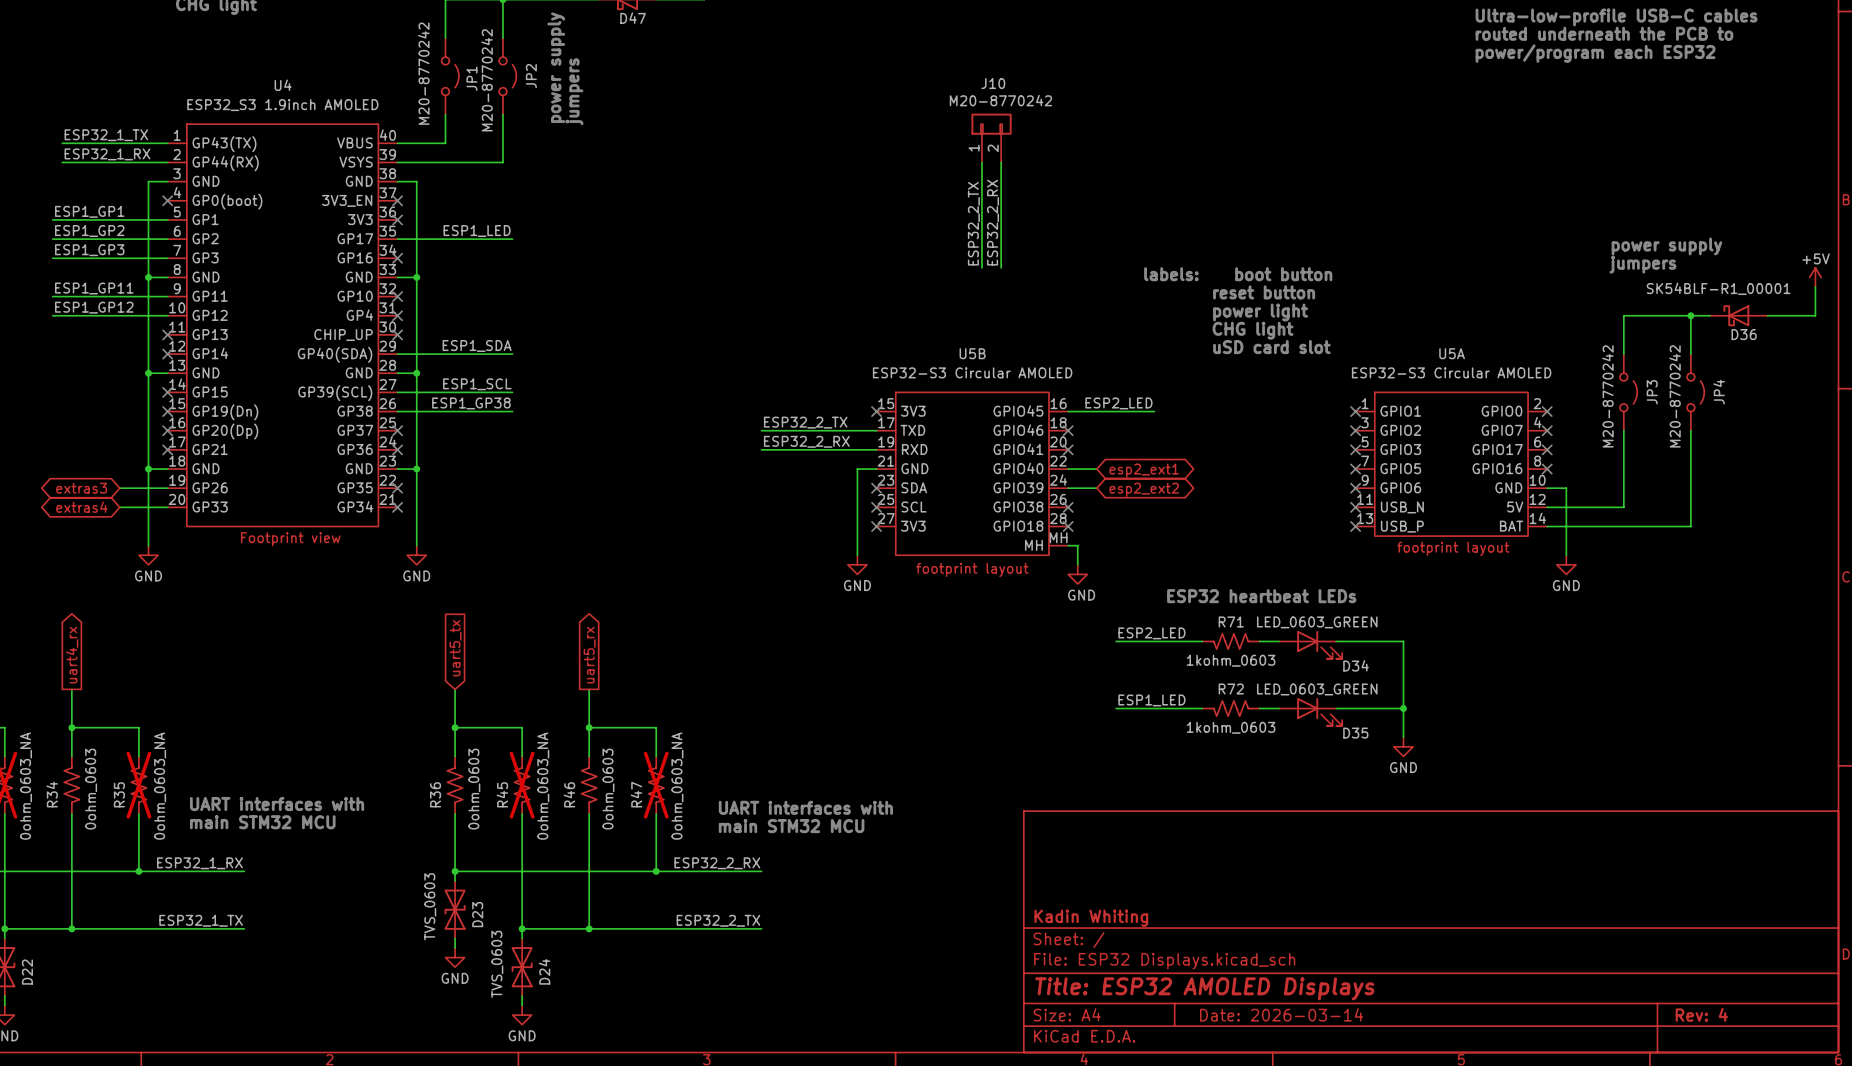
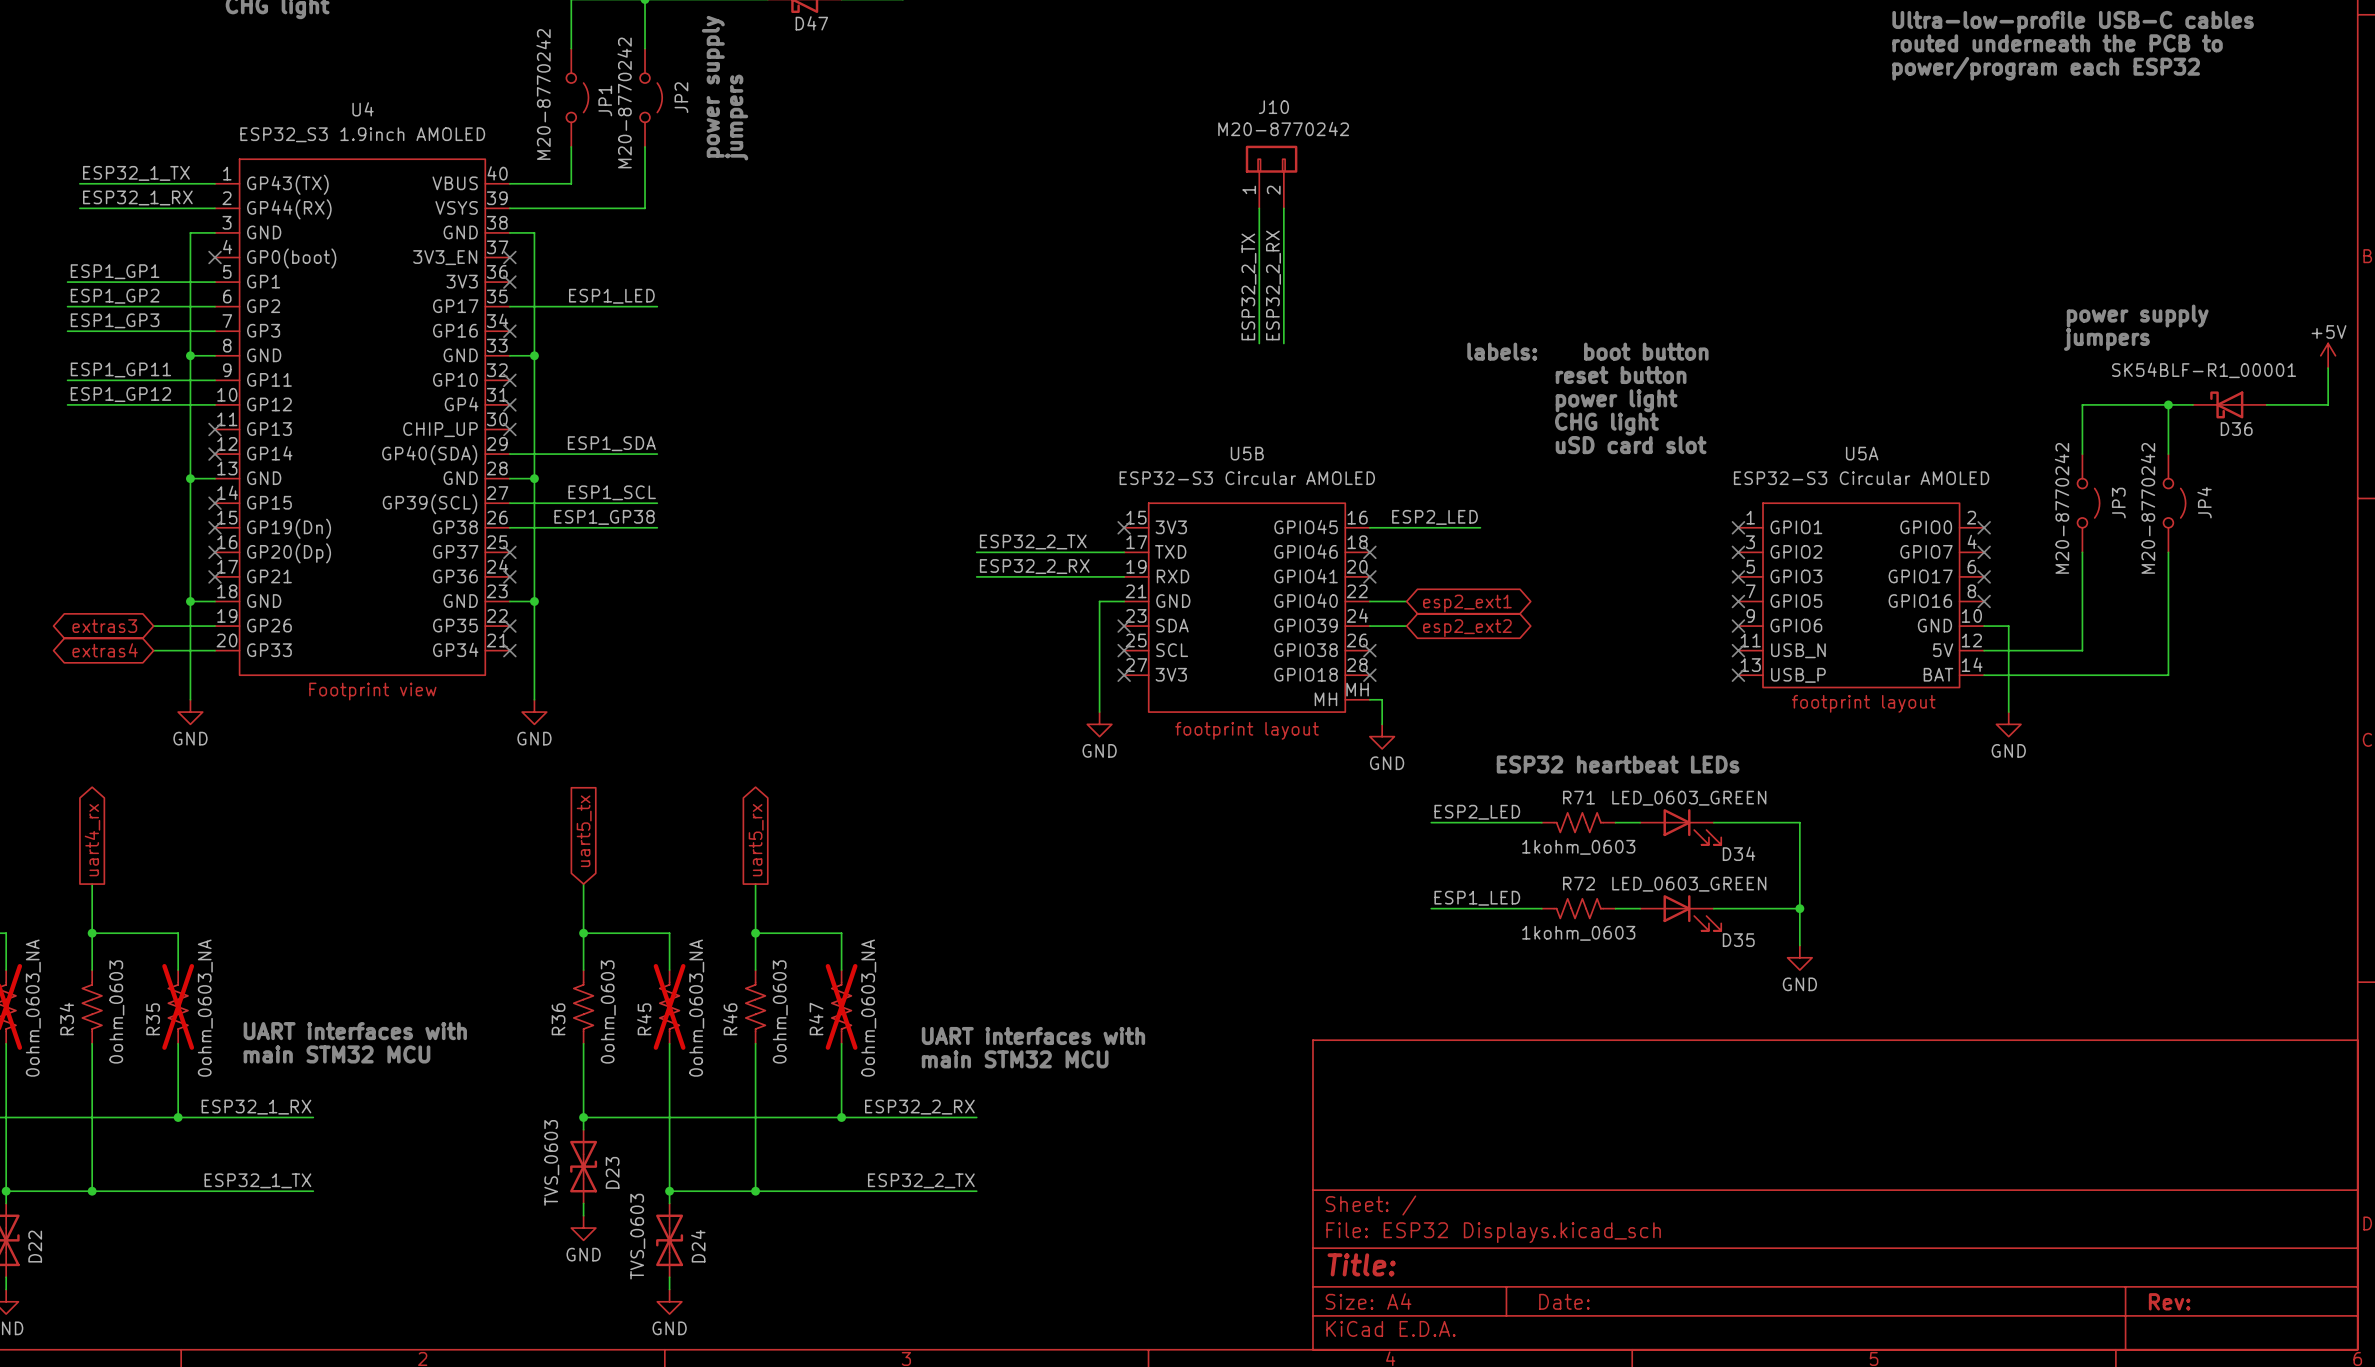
title block: Kadin Whiting (1091, 918) -> none
title block: Title: ESP32 AMOLED Displays (1204, 988) -> Title: (1361, 1264)
title block: Date: 2026-03-14 (1281, 1014) -> Date: (1564, 1301)
title block: Rev: 4 (1701, 1014) -> Rev: (2169, 1301)

